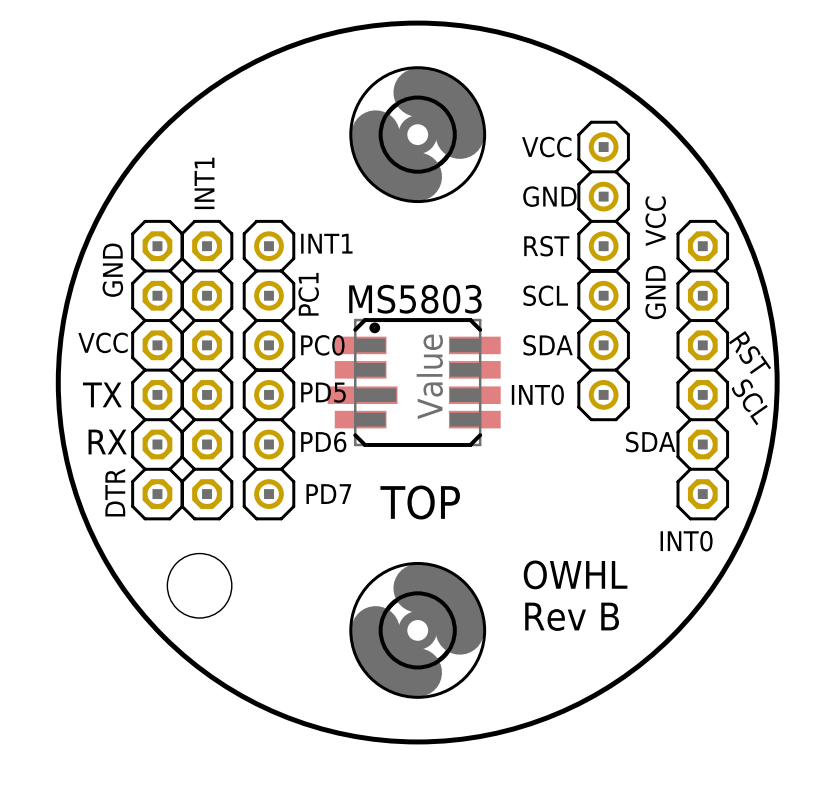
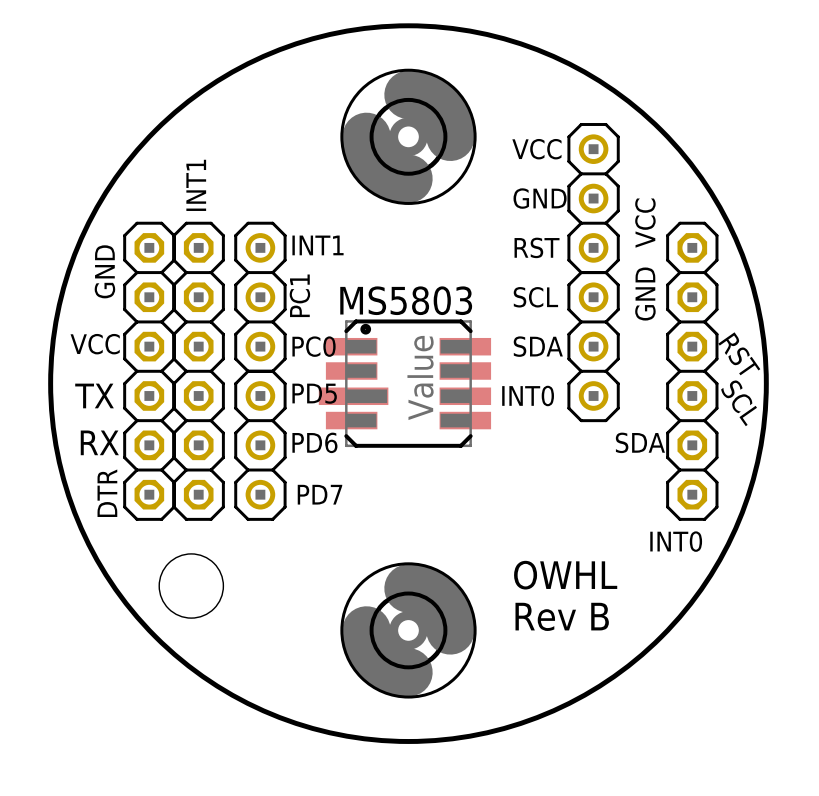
text: TOP (420, 502) -> none

